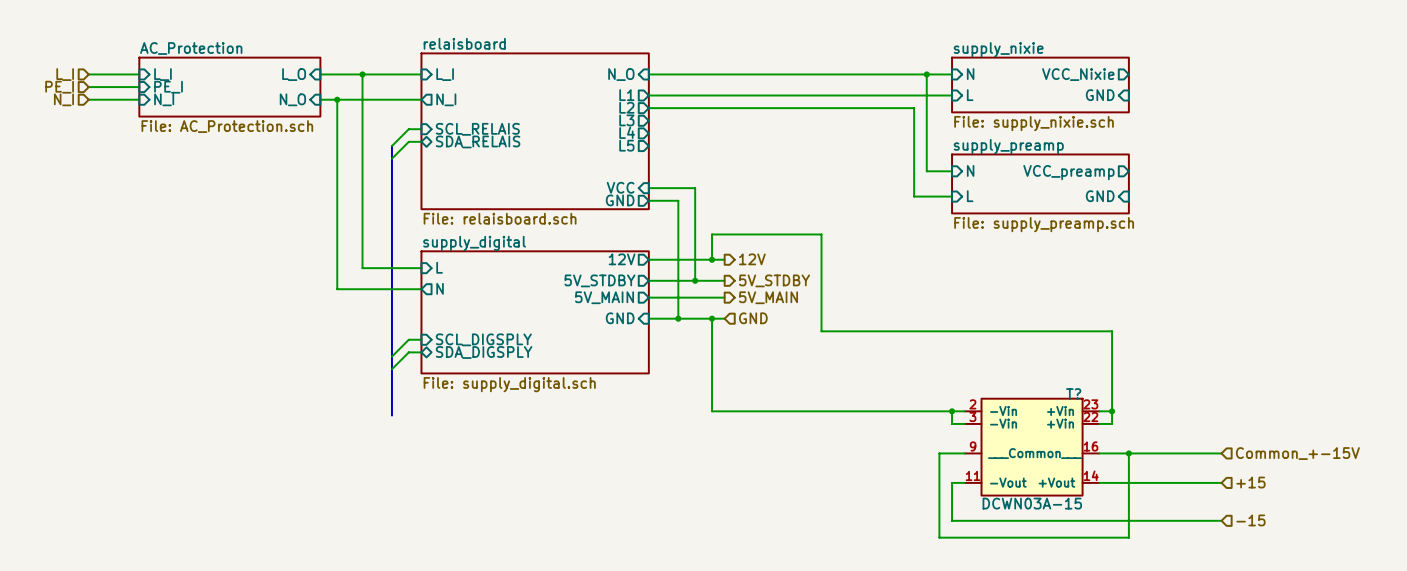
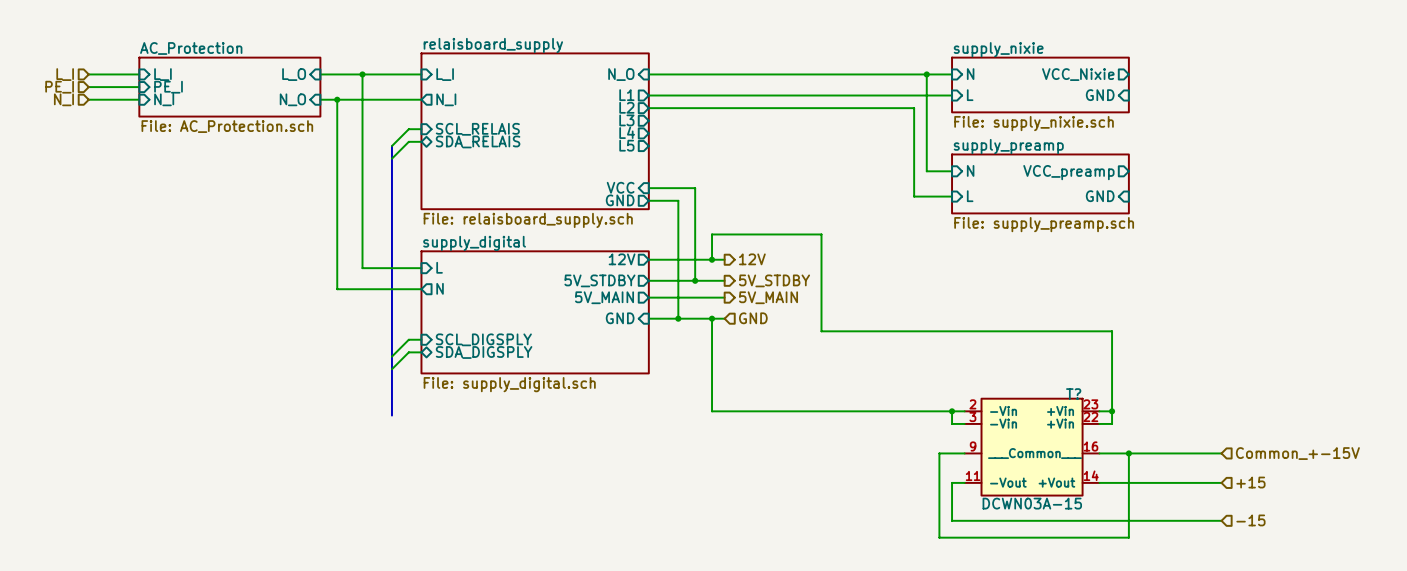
sheet relaisboard name: relaisboard (464, 43) -> relaisboard_supply (493, 45)
sheet relaisboard value: File: relaisboard.sch (500, 218) -> File: relaisboard_supply.sch (528, 220)

